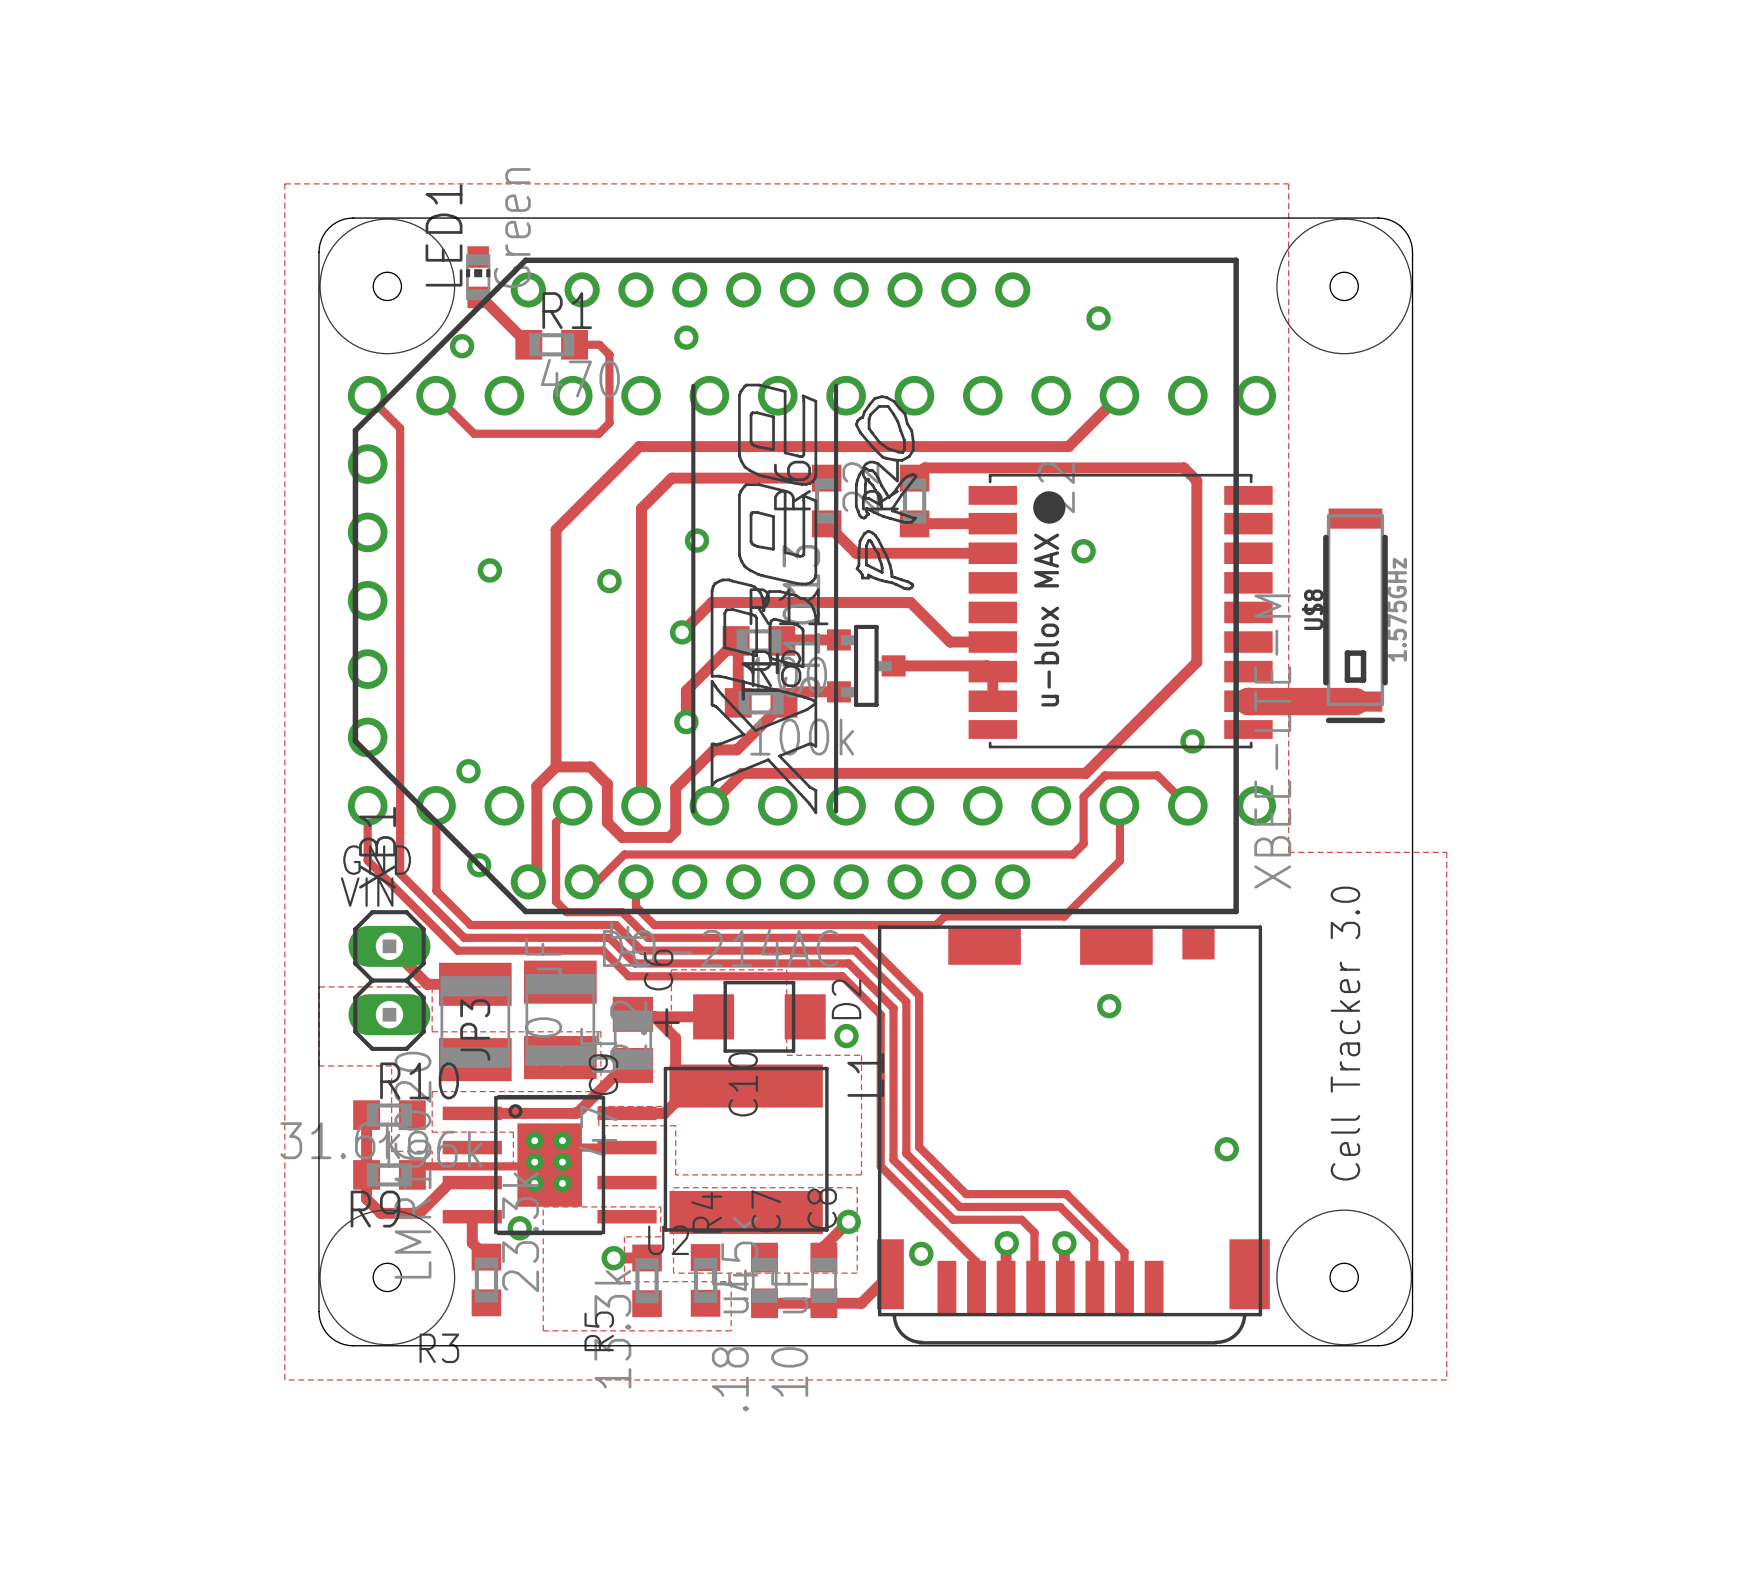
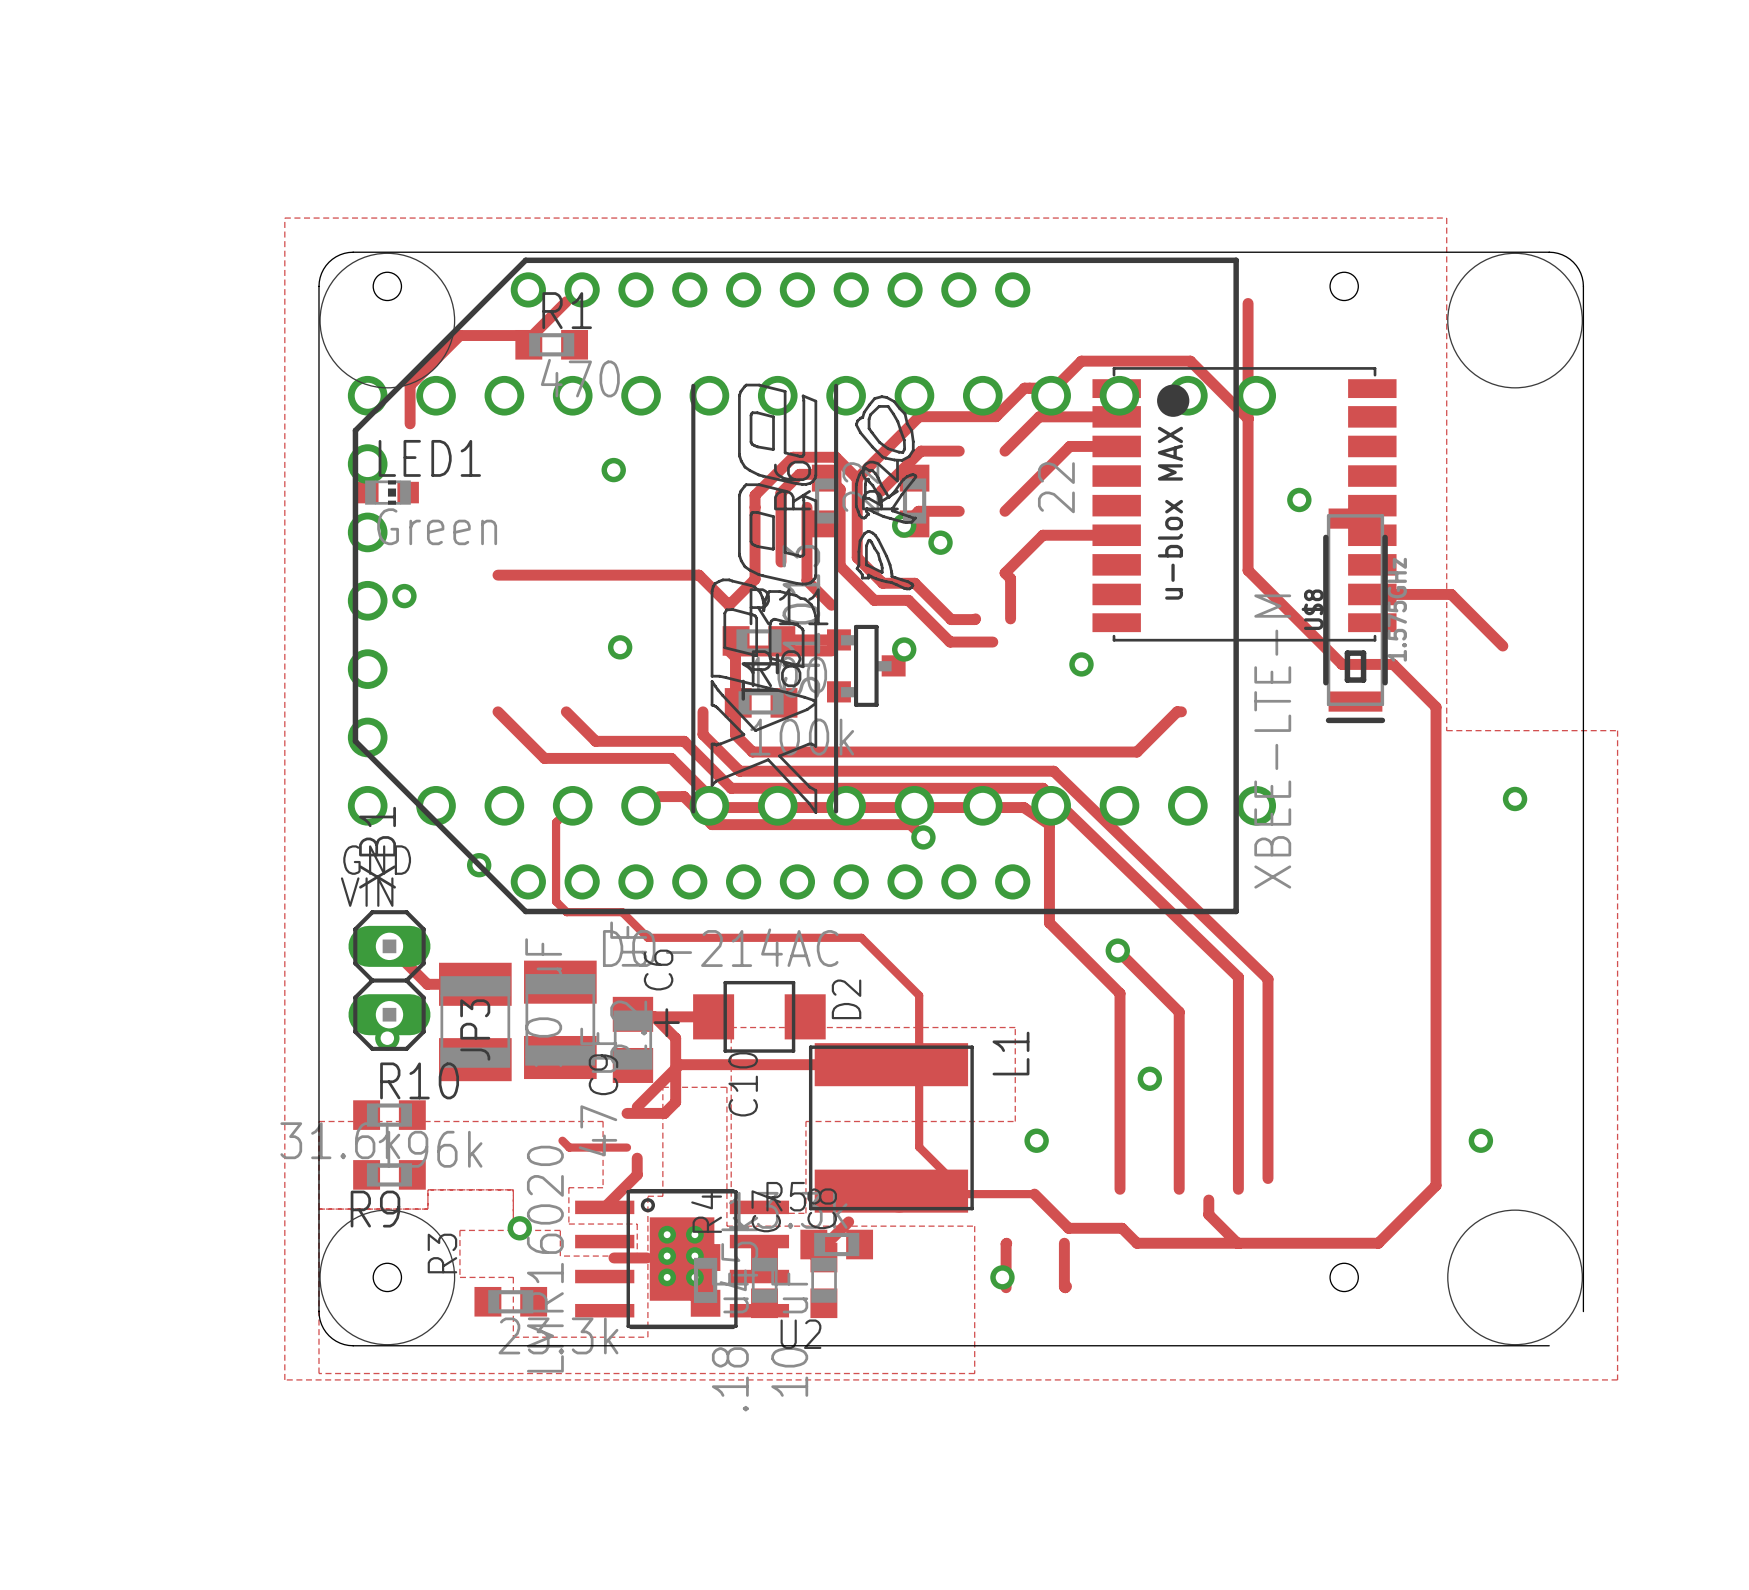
zone outline: (284, 218) (284, 183) (1288, 183) (1288, 852) (1446, 852) (1446, 1379) -> (284, 218) (1446, 218) (1446, 730) (1617, 730) (1617, 1379) (1446, 1379)
LED1 rotation: 0° (478, 277) -> 90° clockwise (387, 492)
LED1 position: (478, 277) -> (387, 492)
board edge: (318, 286) (319, 247) (323, 235) (336, 222) (353, 218) (1378, 218) (1391, 220) (1402, 228) (1409, 239) (1412, 252) (1412, 1311) (1409, 1324) (1402, 1335) (1391, 1343) (1378, 1345) -> (318, 286) (321, 273) (329, 262) (340, 254) (353, 252) (1549, 252) (1558, 253) (1570, 259) (1578, 269) (1583, 286) (1583, 1311)
drawing position: (387, 286) -> (387, 320)
drawing position: (1344, 286) -> (1515, 320)
track: (478, 297) (481, 297) (528, 344) -> none
track: none -> (566, 301) (532, 335) (459, 335) (410, 385) (410, 423)
via: (1098, 318) -> none
via: (686, 337) -> none
track: (574, 344) (599, 344) (609, 354) (609, 423) (598, 433) (474, 433) (436, 395) -> none
via: (462, 346) -> none
track: (367, 395) (400, 428) (400, 873) (464, 937) (609, 937) (635, 963) (848, 963) (893, 1008) (893, 1159) (953, 1219) (1021, 1219) (1034, 1232) (1035, 1287) -> none
track: (1119, 395) (1068, 446) (639, 446) (556, 529) (556, 766) -> none
track: none -> (1116, 416) (1039, 416) (1005, 451)
track: none -> (1248, 418) (1190, 361) (1081, 361) (1054, 388) (1024, 388) (996, 416) (919, 416) (857, 478)
track: none -> (1116, 446) (1069, 446) (1005, 511)
track: none -> (959, 451) (921, 451) (880, 491)
via: none -> (613, 470)
track: (826, 478) (671, 478) (641, 508) (641, 805) -> none
track: none -> (857, 478) (857, 557) (882, 583) (914, 583) (951, 619) (975, 618)
track: none -> (857, 478) (835, 457) (793, 457) (755, 495) (755, 579) (729, 605) (698, 575) (497, 575)
track: (914, 478) (924, 467) (1184, 467) (1196, 480) (1196, 662) (1085, 773) (741, 773) (709, 805) -> none
via: none -> (1299, 499)
track: none -> (806, 507) (806, 580) (831, 605)
track: none -> (959, 511) (918, 511) (904, 525)
track: (826, 523) (856, 553) (992, 553) -> none
track: (914, 523) (992, 523) -> none
via: none -> (904, 525)
track: none -> (1116, 535) (1042, 535) (1005, 573) (1010, 578) (1010, 618)
via: (697, 540) -> none
via: none -> (940, 542)
via: (1083, 551) -> none
via: (489, 570) -> none
via: (609, 581) -> none
track: none -> (1372, 594) (1451, 594) (1502, 646)
via: none -> (404, 596)
track: (910, 602) (711, 602) (682, 632) -> (910, 602) (908, 600) (874, 600) (840, 566) (840, 489) (825, 474) (799, 474) (781, 492) (781, 562)
part position: (1120, 611) -> (1244, 504)
via: (682, 632) -> none
via: none -> (620, 647)
via: none -> (904, 649)
track: none -> (831, 651) (729, 651) (735, 657) (735, 734) (752, 752) (1137, 752) (1177, 711) (1181, 711)
via: none -> (1081, 664)
track: (893, 665) (987, 665) (992, 671) (992, 701) -> none
track: (838, 691) (795, 691) (736, 749) (714, 749) (675, 788) (675, 831) (669, 837) (622, 837) (607, 822) (607, 784) (590, 766) (556, 766) -> none
track: (1248, 701) (1355, 701) -> none
track: (738, 702) (738, 643) (736, 640) (686, 690) (686, 722) -> none
track: none -> (497, 711) (544, 758) (671, 758) (720, 807) (1023, 807) (1049, 824) (1049, 922) (1120, 993) (1120, 1189)
track: none -> (566, 711) (595, 741) (684, 741) (731, 788) (1043, 788) (1238, 977) (1238, 1189)
track: none -> (703, 711) (703, 734) (739, 771) (1053, 771) (1268, 979) (1268, 1178)
via: (686, 722) -> none
via: (1192, 741) -> none
track: (556, 766) (536, 786) (536, 873) (528, 881) -> none
via: (468, 771) -> none
track: none -> (659, 796) (683, 796) (711, 824) (910, 824) (923, 837)
via: none -> (1515, 798)
track: (367, 805) (367, 860) (457, 950) (603, 950) (628, 976) (842, 976) (880, 1014) (880, 1166) (976, 1262) (976, 1287) -> none
track: (436, 805) (436, 890) (470, 925) (615, 925) (641, 950) (855, 950) (906, 1001) (906, 1153) (959, 1206) (1060, 1206) (1094, 1241) (1094, 1287) -> none
track: (1119, 805) (1119, 860) (1064, 916) (944, 916) (936, 925) (654, 925) (635, 906) (635, 881) -> none
track: (1187, 805) (1157, 775) (1104, 775) (1083, 796) (1083, 843) (1072, 854) (624, 854) (596, 882) (582, 881) -> none
via: none -> (923, 837)
track: none -> (1117, 950) (1179, 1012) (1179, 1189)
via: none -> (1117, 950)
zone outline: (671, 969) (671, 1106) (598, 1106) (598, 1125) (675, 1125) (675, 1174) (861, 1174) (861, 1055) (786, 1055) (786, 969) (671, 969) -> none
zone outline: (318, 986) (432, 986) (432, 1031) (600, 1031) (600, 1091) (432, 1091) (432, 1132) (513, 1132) (513, 1164) (432, 1164) (432, 1151) (391, 1151) (391, 1065) (318, 1065) (318, 986) -> none
via: (1109, 1006) -> none
zone outline: none -> (731, 1027) (1015, 1027) (1015, 1121) (805, 1121) (805, 1213) (731, 1213) (731, 1027)
text: Cell Tracker 3.0 (1345, 1033) -> none
via: (846, 1036) -> none
via: none -> (387, 1038)
track: none -> (891, 1064) (679, 1064) (637, 1107)
track: (624, 1065) (577, 1112) (472, 1113) -> none
via: none -> (1149, 1078)
zone outline: none -> (662, 1087) (662, 1196) (647, 1196) (647, 1337) (513, 1337) (513, 1277) (459, 1277) (459, 1230) (560, 1230) (560, 1256) (637, 1256) (637, 1224) (568, 1224) (568, 1187) (603, 1187) (603, 1121) (318, 1121) (318, 1373) (974, 1373) (974, 1226) (726, 1226) (726, 1087) (662, 1087)
track: (366, 1115) (366, 1199) (380, 1213) (419, 1213) (450, 1182) (472, 1182) -> none
part: (1073, 1135) -> none
via: (534, 1140) -> none
via: (562, 1140) -> none
via: none -> (1036, 1140)
via: none -> (1480, 1140)
L1 position: (746, 1149) -> (891, 1127)
via: (1226, 1149) -> none
track: none -> (637, 1158) (637, 1174) (604, 1207)
track: (534, 1162) (530, 1166) (420, 1166) (412, 1174) -> none
via: (534, 1162) -> none
via: (562, 1162) -> none
U2 position: (549, 1165) -> (682, 1259)
via: (534, 1183) -> none
via: (562, 1183) -> none
zone outline: (673, 1187) (857, 1187) (857, 1273) (673, 1273) (673, 1187) -> none
track: (1034, 1194) (1066, 1194) (1124, 1252) (1124, 1287) -> (1034, 1194) (1068, 1228) (1122, 1228) (1137, 1243) (1378, 1243) (1436, 1185) (1436, 707) (1393, 664) (1342, 664) (1248, 570) (1248, 303)
track: none -> (1208, 1200) (1208, 1214) (1237, 1243)
zone outline: (543, 1206) (660, 1206) (660, 1236) (624, 1236) (624, 1281) (731, 1281) (731, 1330) (543, 1330) (543, 1206) -> none
zone outline: none -> (318, 1209) (427, 1209) (427, 1189) (513, 1189) (513, 1230)
track: (472, 1216) (472, 1242) (486, 1257) -> none
via: (848, 1221) -> none
via: none -> (667, 1234)
via: none -> (694, 1234)
via position: (1006, 1243) -> (1002, 1277)
via: (1064, 1243) -> none
via: (921, 1253) -> none
via: none -> (667, 1256)
via: none -> (694, 1256)
via: (613, 1258) -> none
track: (890, 1274) (861, 1303) (764, 1303) -> none
via: none -> (667, 1277)
via: none -> (694, 1277)
drawing position: (1344, 1277) -> (1515, 1277)
R3 rotation: 0° (486, 1279) -> 90° clockwise (510, 1301)
R5 rotation: 0° (647, 1280) -> 90° clockwise (836, 1244)
R5 position: (647, 1280) -> (836, 1244)
board edge: none -> (1378, 1345) (1549, 1345)

